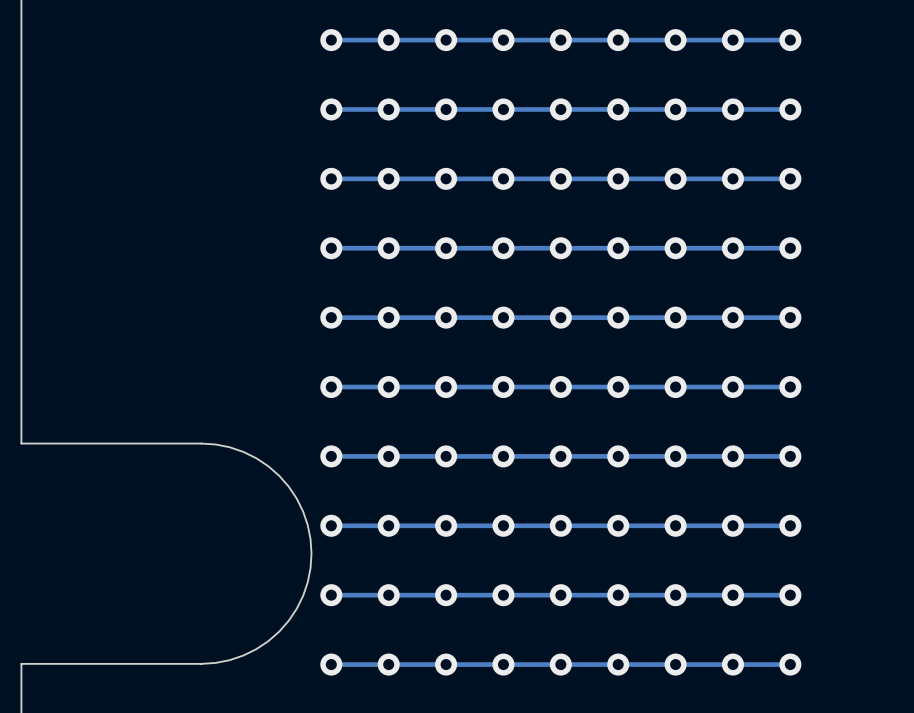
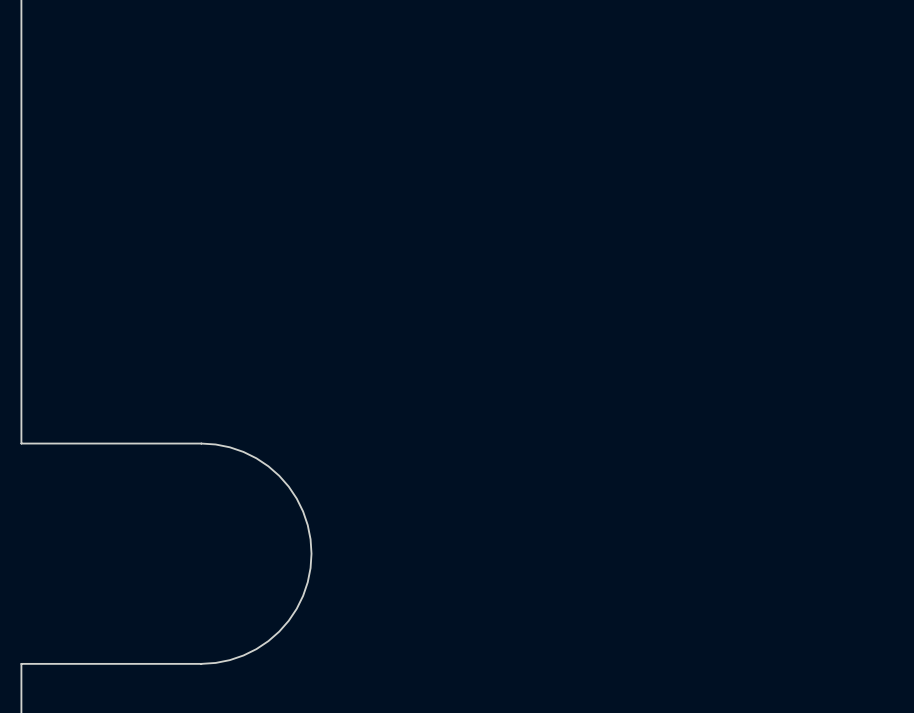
via: (331, 40) -> none
via: (388, 40) -> none
via: (446, 40) -> none
via: (503, 40) -> none
via: (560, 40) -> none
via: (618, 40) -> none
via: (675, 40) -> none
via: (732, 40) -> none
track: (790, 40) (331, 40) -> none
via: (790, 40) -> none
via: (331, 109) -> none
via: (388, 109) -> none
via: (446, 109) -> none
via: (503, 109) -> none
via: (560, 109) -> none
via: (618, 109) -> none
via: (675, 109) -> none
via: (732, 109) -> none
track: (790, 109) (331, 109) -> none
via: (790, 109) -> none
via: (331, 178) -> none
via: (388, 178) -> none
via: (446, 178) -> none
via: (503, 178) -> none
via: (560, 178) -> none
via: (618, 178) -> none
via: (675, 178) -> none
via: (732, 178) -> none
track: (790, 178) (331, 178) -> none
via: (790, 178) -> none
via: (331, 248) -> none
via: (388, 248) -> none
via: (446, 248) -> none
via: (503, 248) -> none
via: (560, 248) -> none
via: (618, 248) -> none
via: (675, 248) -> none
via: (732, 248) -> none
track: (790, 248) (331, 248) -> none
via: (790, 248) -> none
via: (331, 317) -> none
via: (388, 317) -> none
via: (446, 317) -> none
via: (503, 317) -> none
via: (560, 317) -> none
via: (618, 317) -> none
via: (675, 317) -> none
via: (732, 317) -> none
track: (790, 317) (331, 317) -> none
via: (790, 317) -> none
via: (331, 387) -> none
via: (388, 387) -> none
via: (446, 387) -> none
via: (503, 387) -> none
via: (560, 387) -> none
via: (618, 387) -> none
via: (675, 387) -> none
via: (732, 387) -> none
track: (790, 387) (331, 387) -> none
via: (790, 387) -> none
via: (331, 456) -> none
via: (388, 456) -> none
via: (446, 456) -> none
via: (503, 456) -> none
via: (560, 456) -> none
via: (618, 456) -> none
via: (675, 456) -> none
via: (732, 456) -> none
track: (790, 456) (331, 456) -> none
via: (790, 456) -> none
via: (331, 525) -> none
via: (388, 525) -> none
via: (446, 525) -> none
via: (503, 525) -> none
via: (560, 525) -> none
via: (618, 525) -> none
via: (675, 525) -> none
via: (732, 525) -> none
track: (790, 525) (331, 525) -> none
via: (790, 525) -> none
via: (331, 595) -> none
via: (388, 595) -> none
via: (446, 595) -> none
via: (503, 595) -> none
via: (560, 595) -> none
via: (618, 595) -> none
via: (675, 595) -> none
via: (732, 595) -> none
track: (790, 595) (331, 595) -> none
via: (790, 595) -> none
via: (331, 664) -> none
via: (388, 664) -> none
via: (446, 664) -> none
via: (503, 664) -> none
via: (560, 664) -> none
via: (618, 664) -> none
via: (675, 664) -> none
via: (732, 664) -> none
track: (790, 664) (331, 664) -> none
via: (790, 664) -> none

